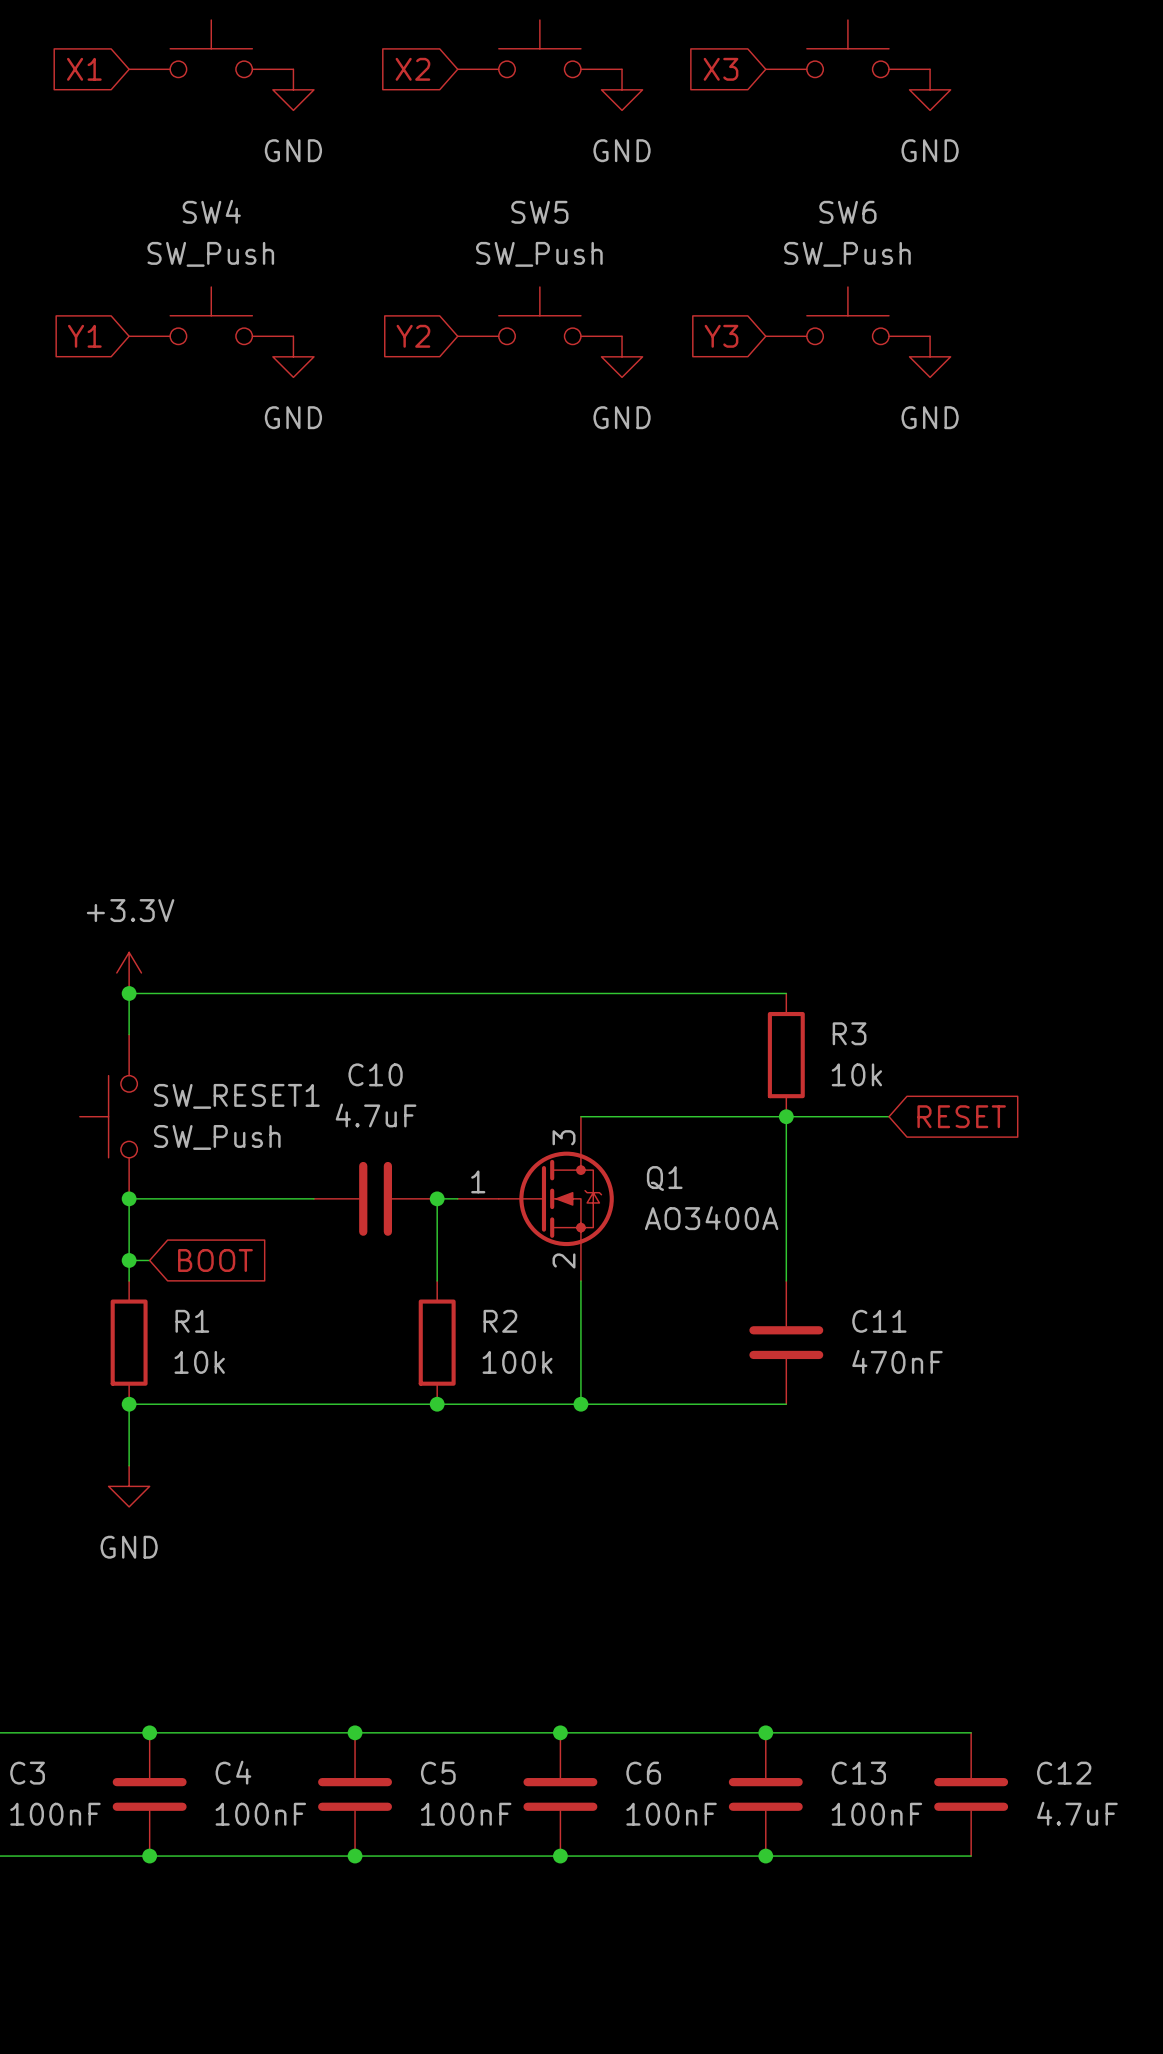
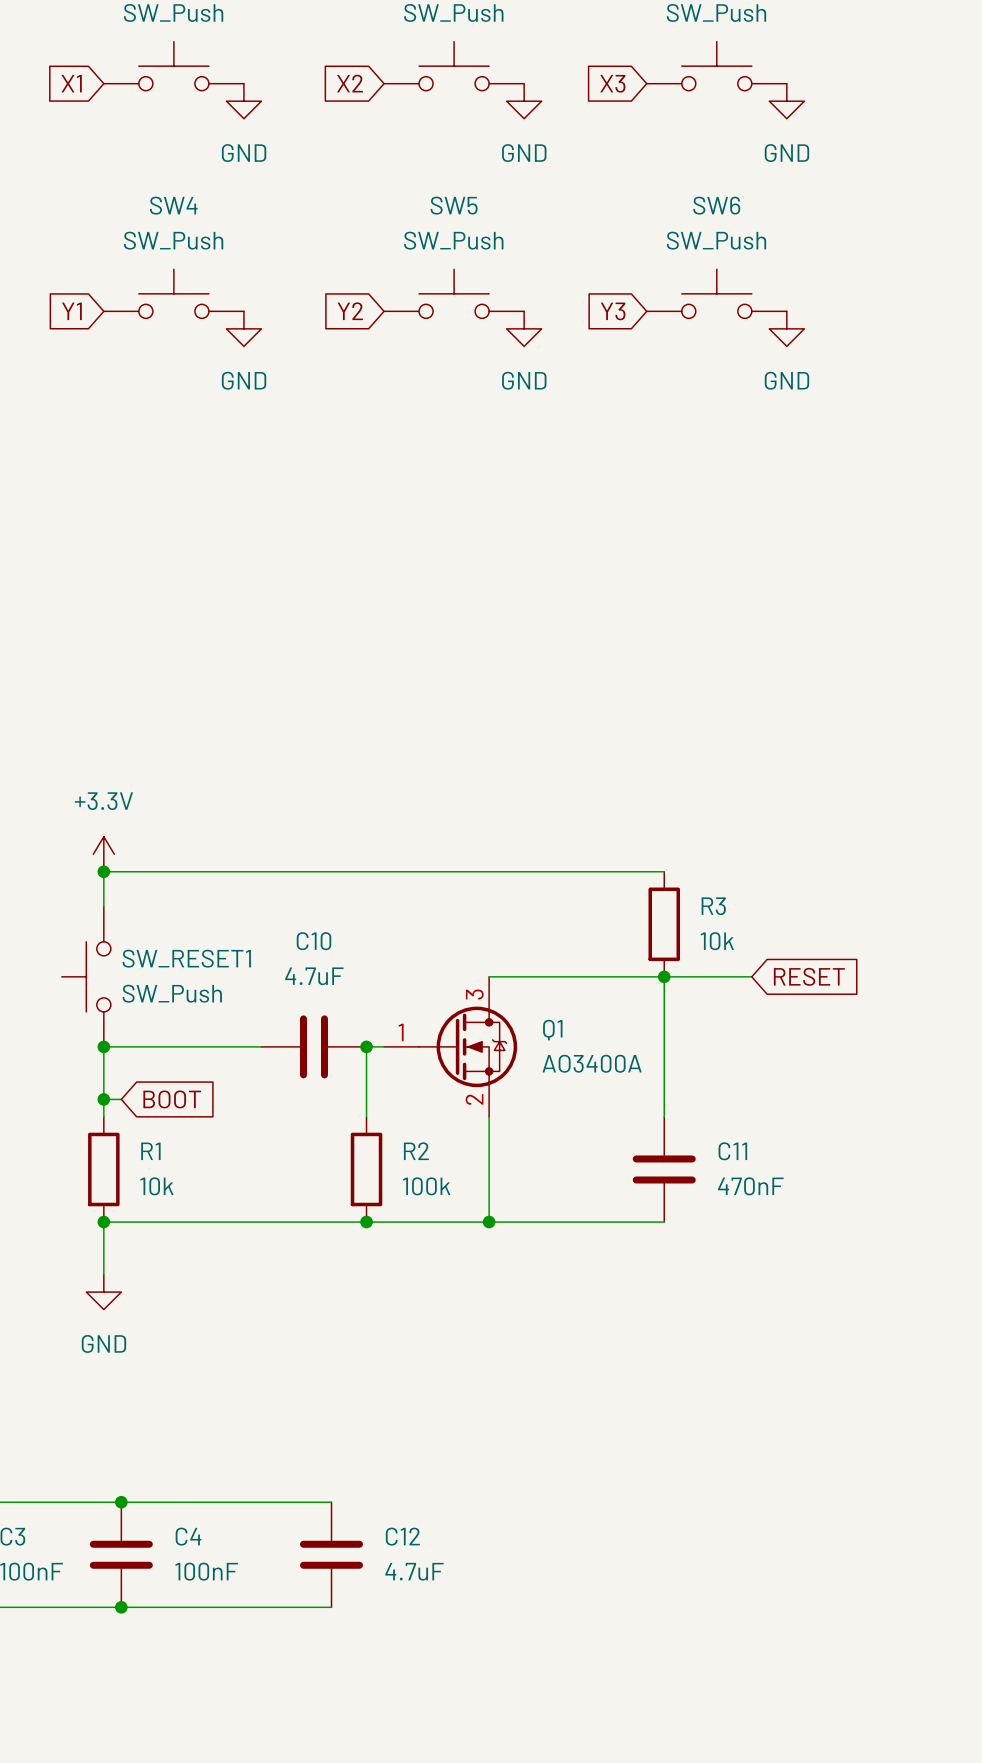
junction: (355, 1732) -> none
wire: (396, 1732) (971, 1732) -> none
junction: (560, 1732) -> none
junction: (765, 1732) -> none
C5: 100nF (355, 1794) -> none
C6: 100nF (560, 1794) -> none
C13: 100nF (765, 1794) -> none
C12 position: (971, 1794) -> (331, 1554)
junction: (355, 1856) -> none
wire: (396, 1856) (971, 1856) -> none
junction: (560, 1856) -> none
junction: (765, 1856) -> none

